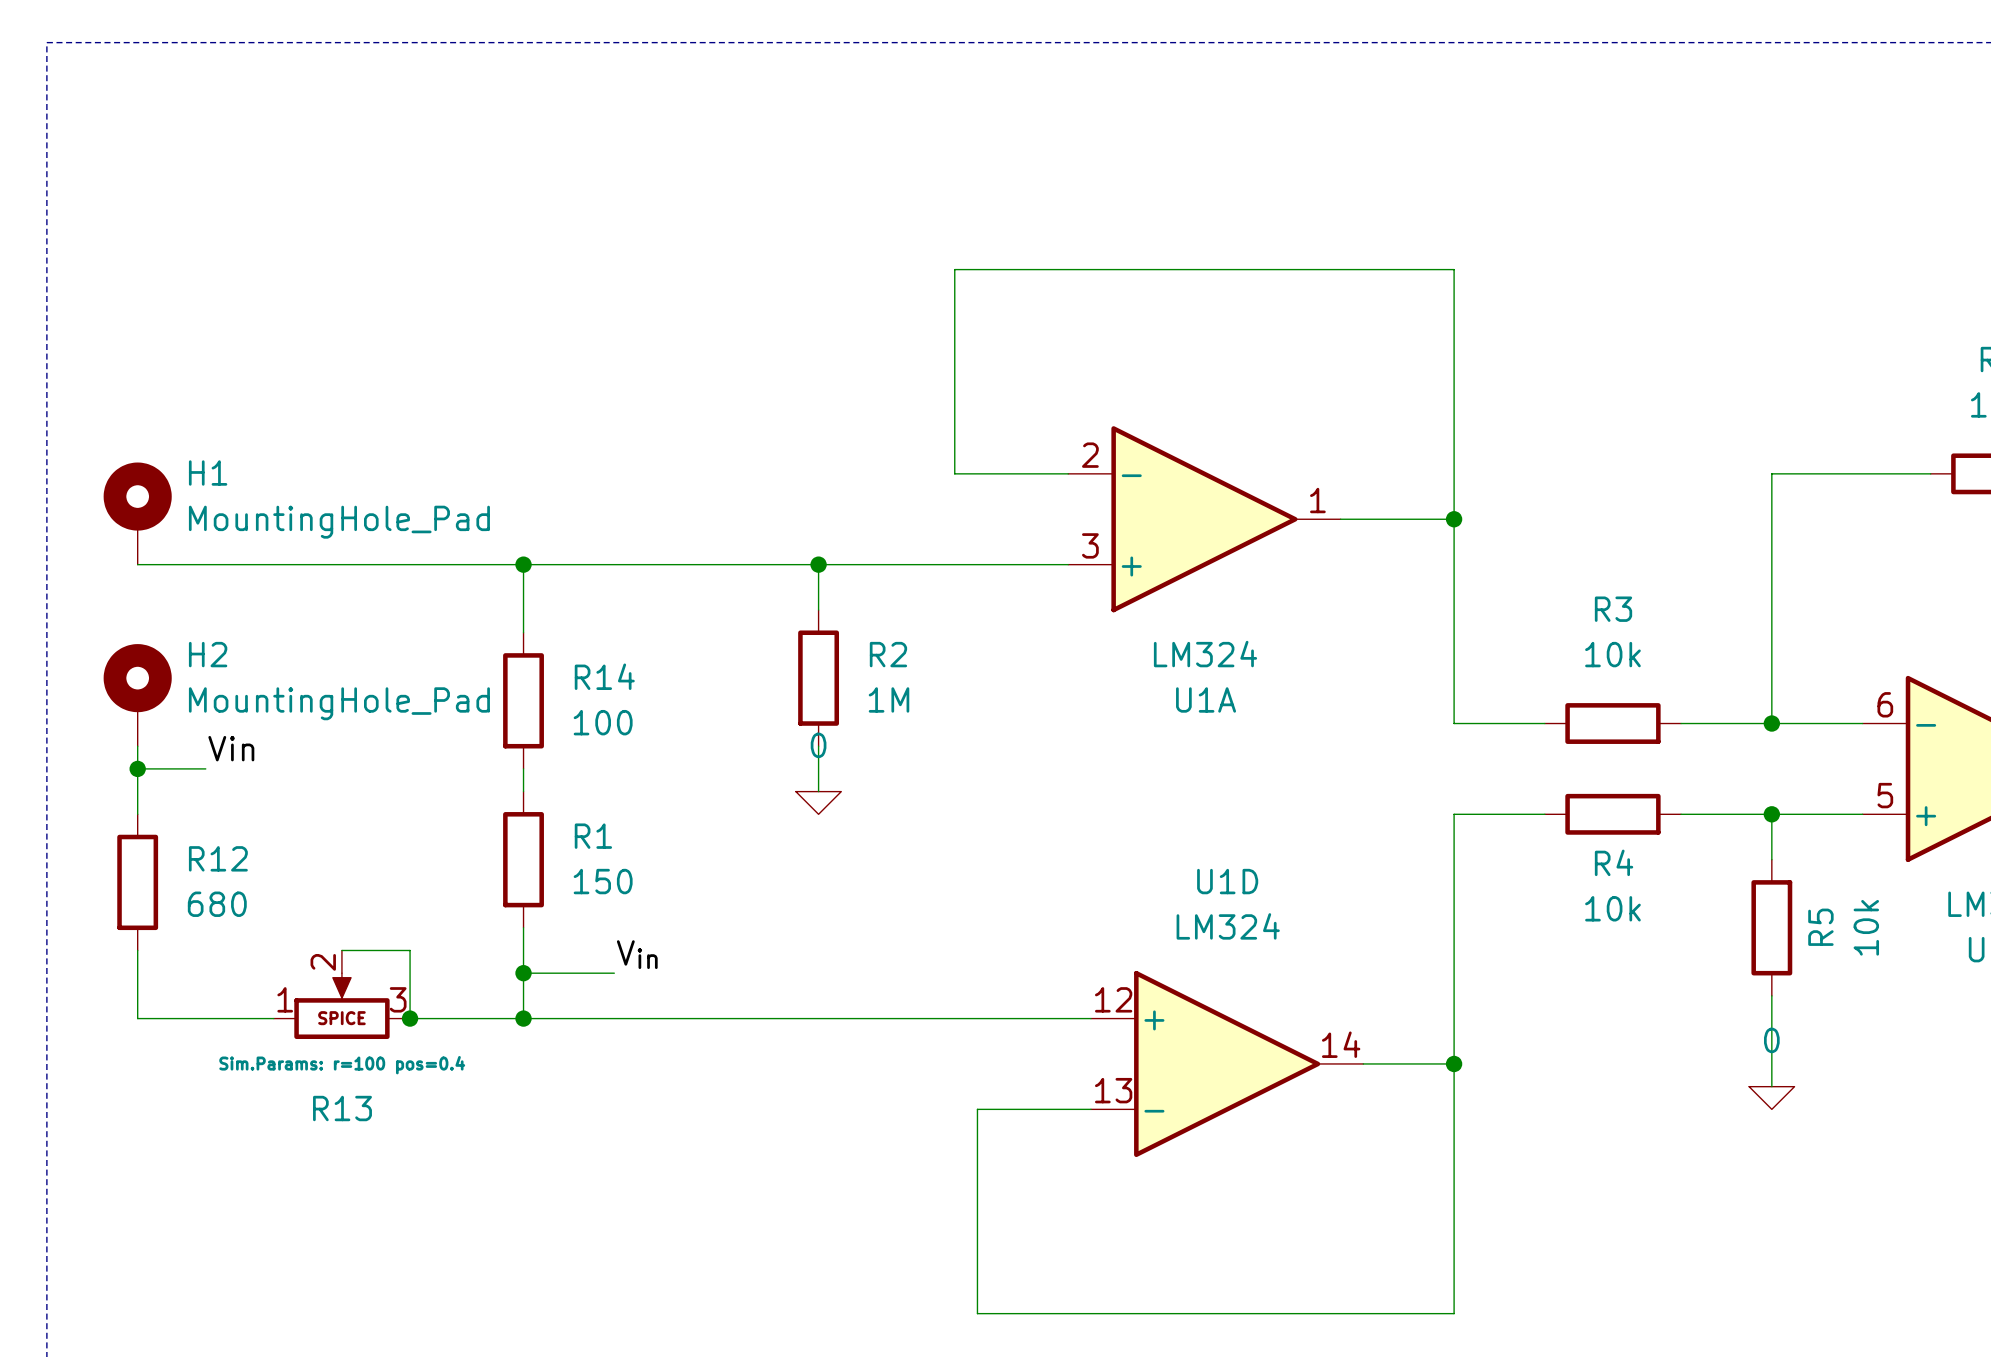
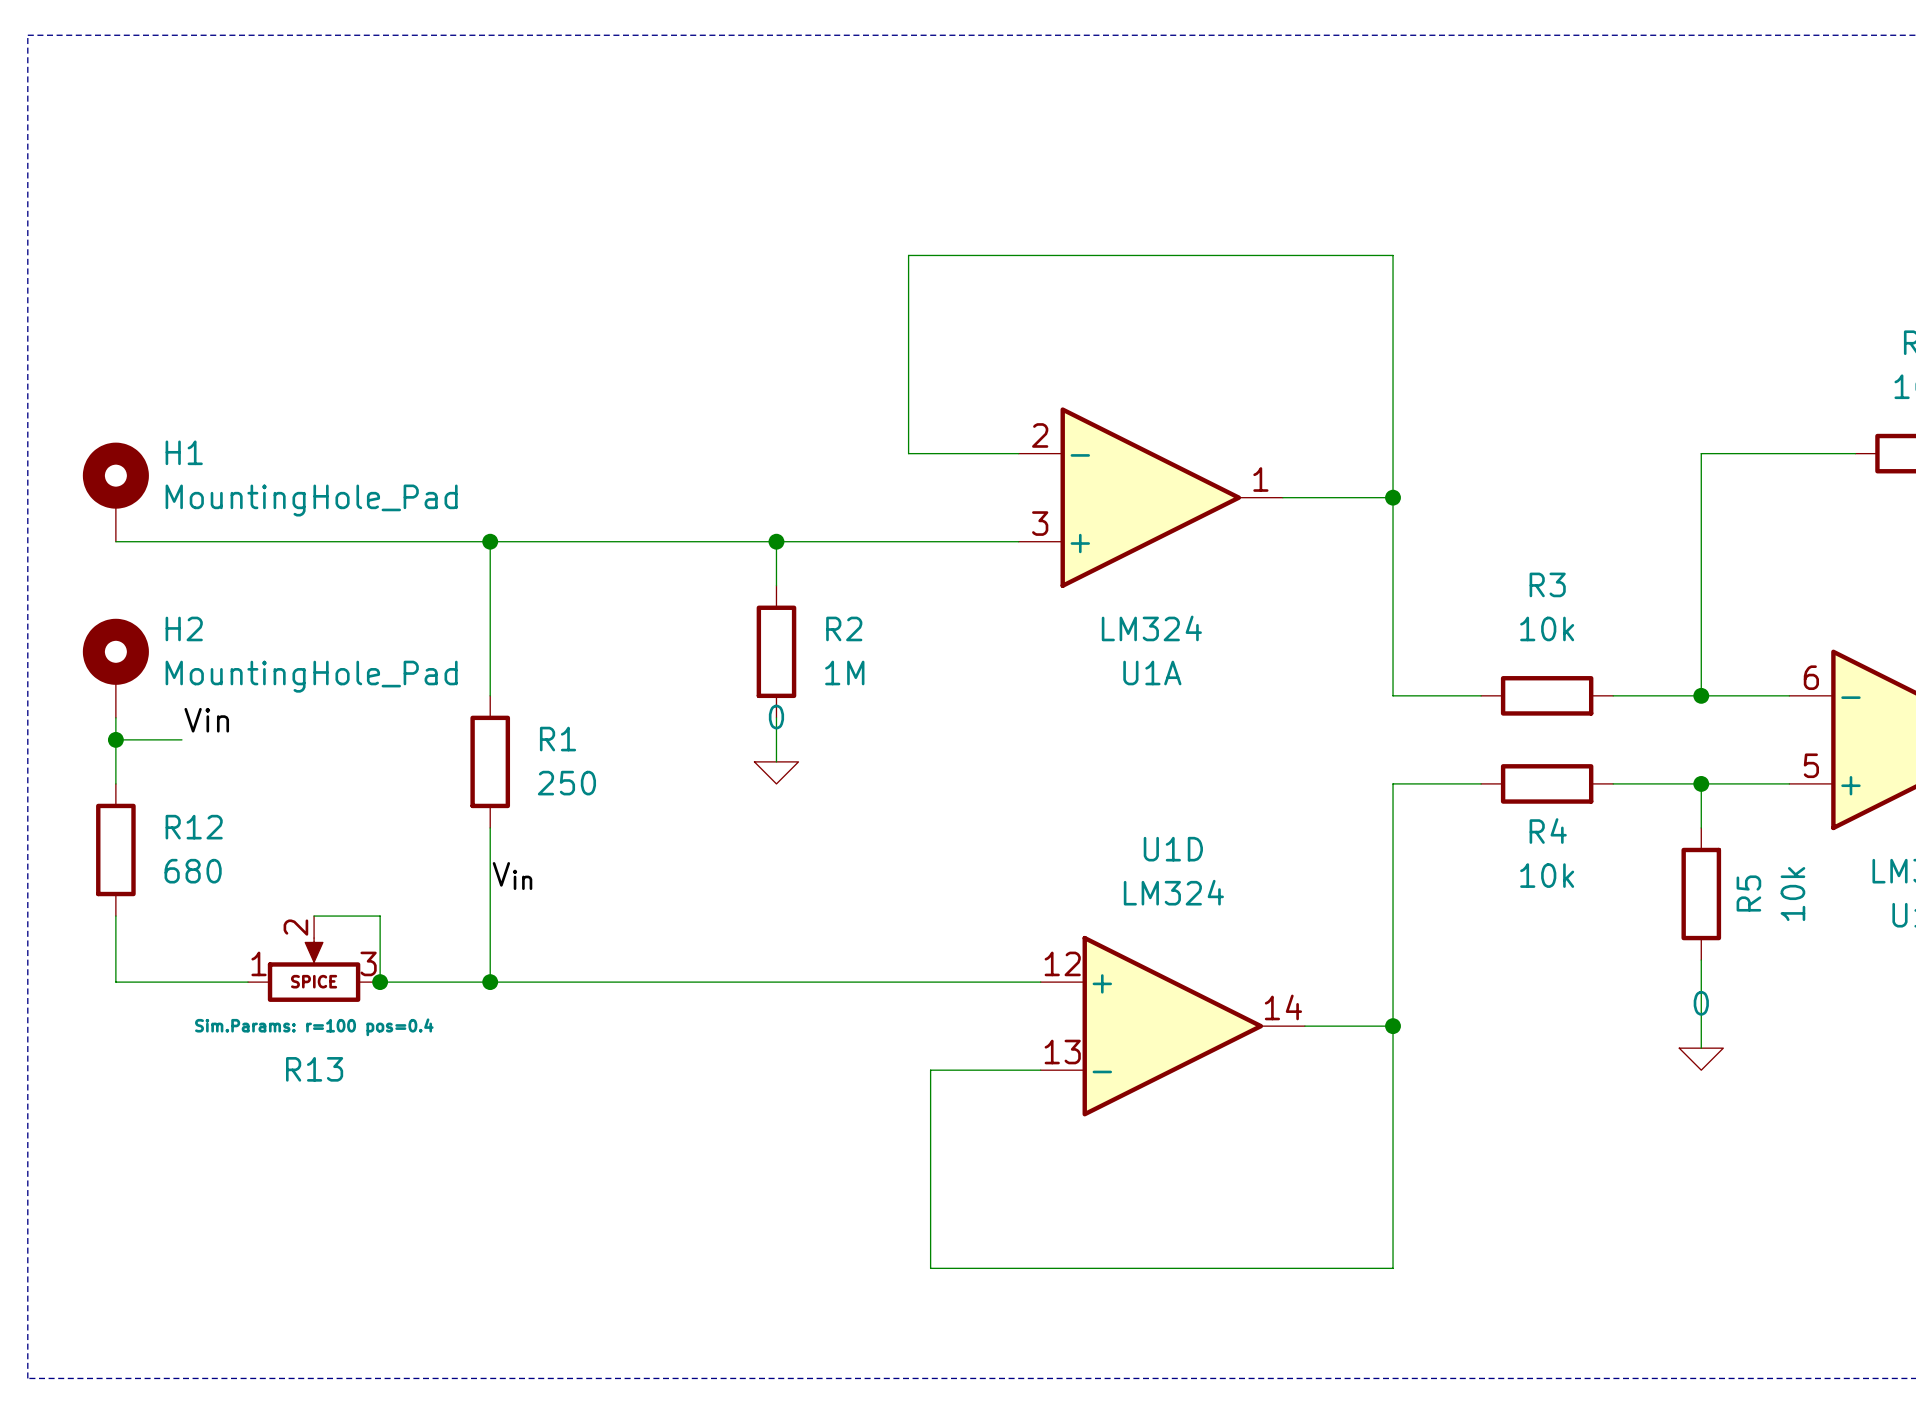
wire: none -> (490, 607) (490, 695)
R14: 100 (523, 700) -> none
wire: (523, 768) (523, 791) -> none
wire: none -> (490, 827) (490, 894)
R1 position: (523, 859) -> (490, 761)
R1 value: 150 (603, 881) -> 250 (566, 783)
label position: Vin (637, 954) -> Vin (512, 876)
wire: (523, 973) (614, 973) -> none
junction: (523, 973) -> none

